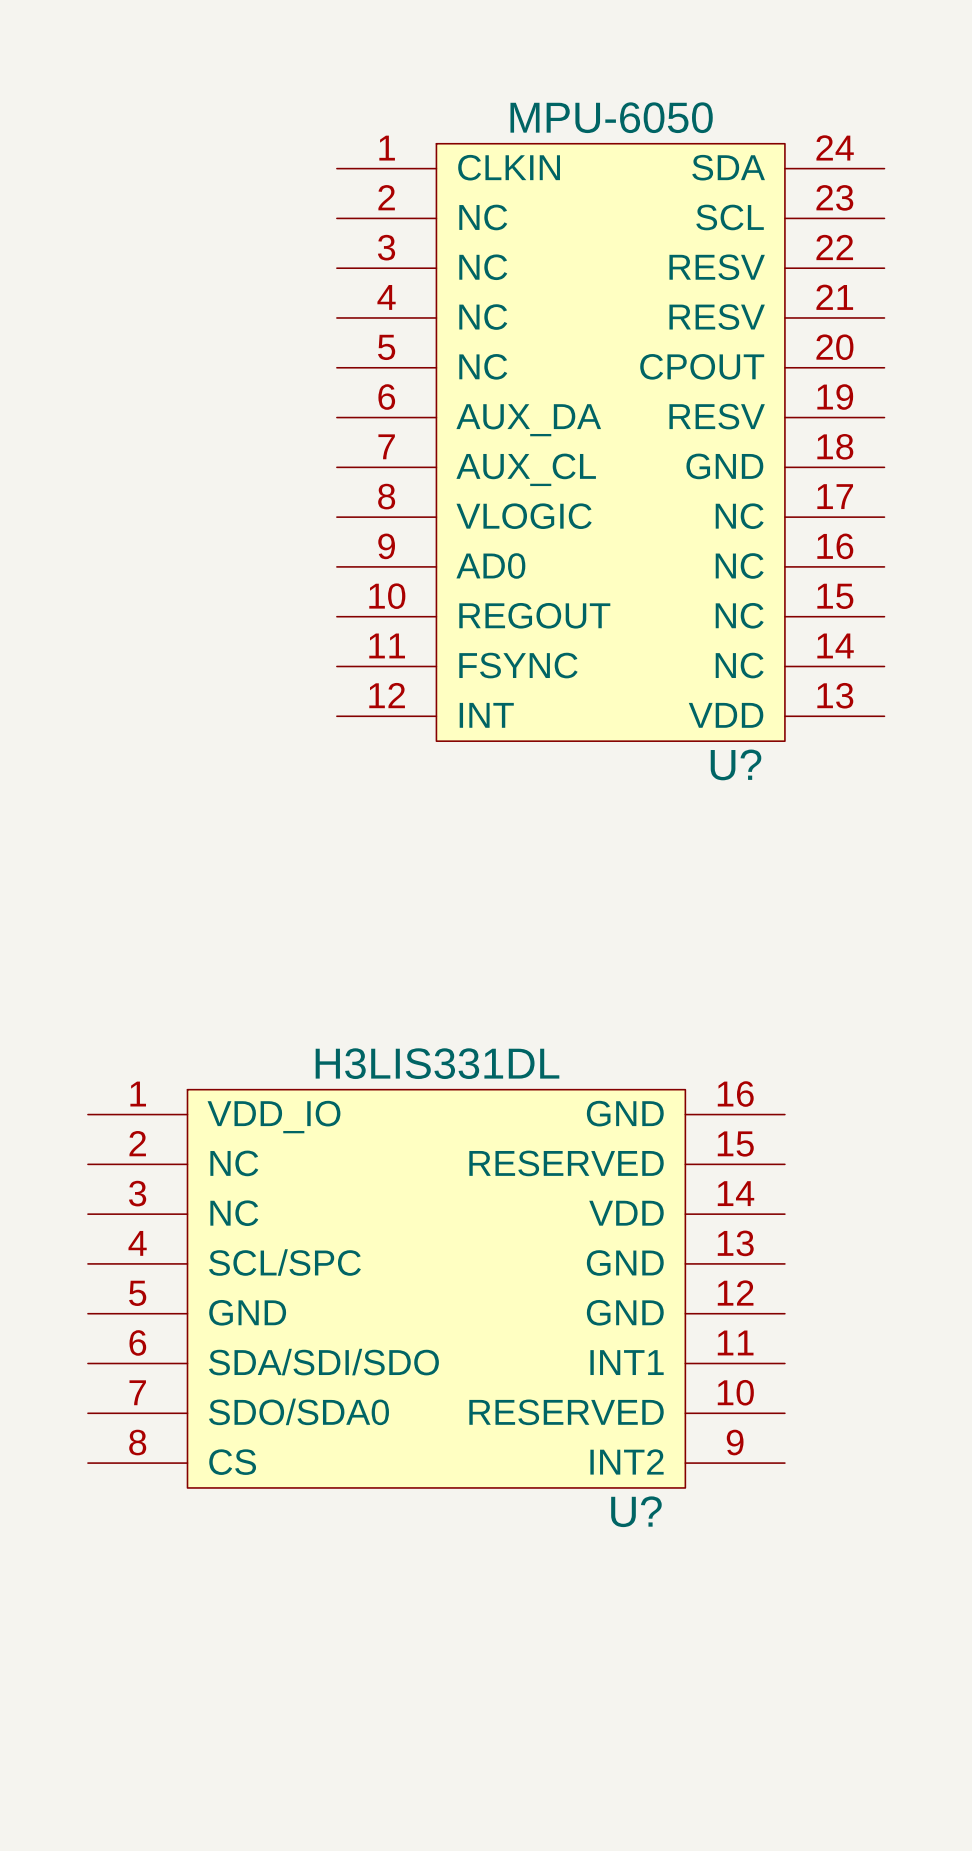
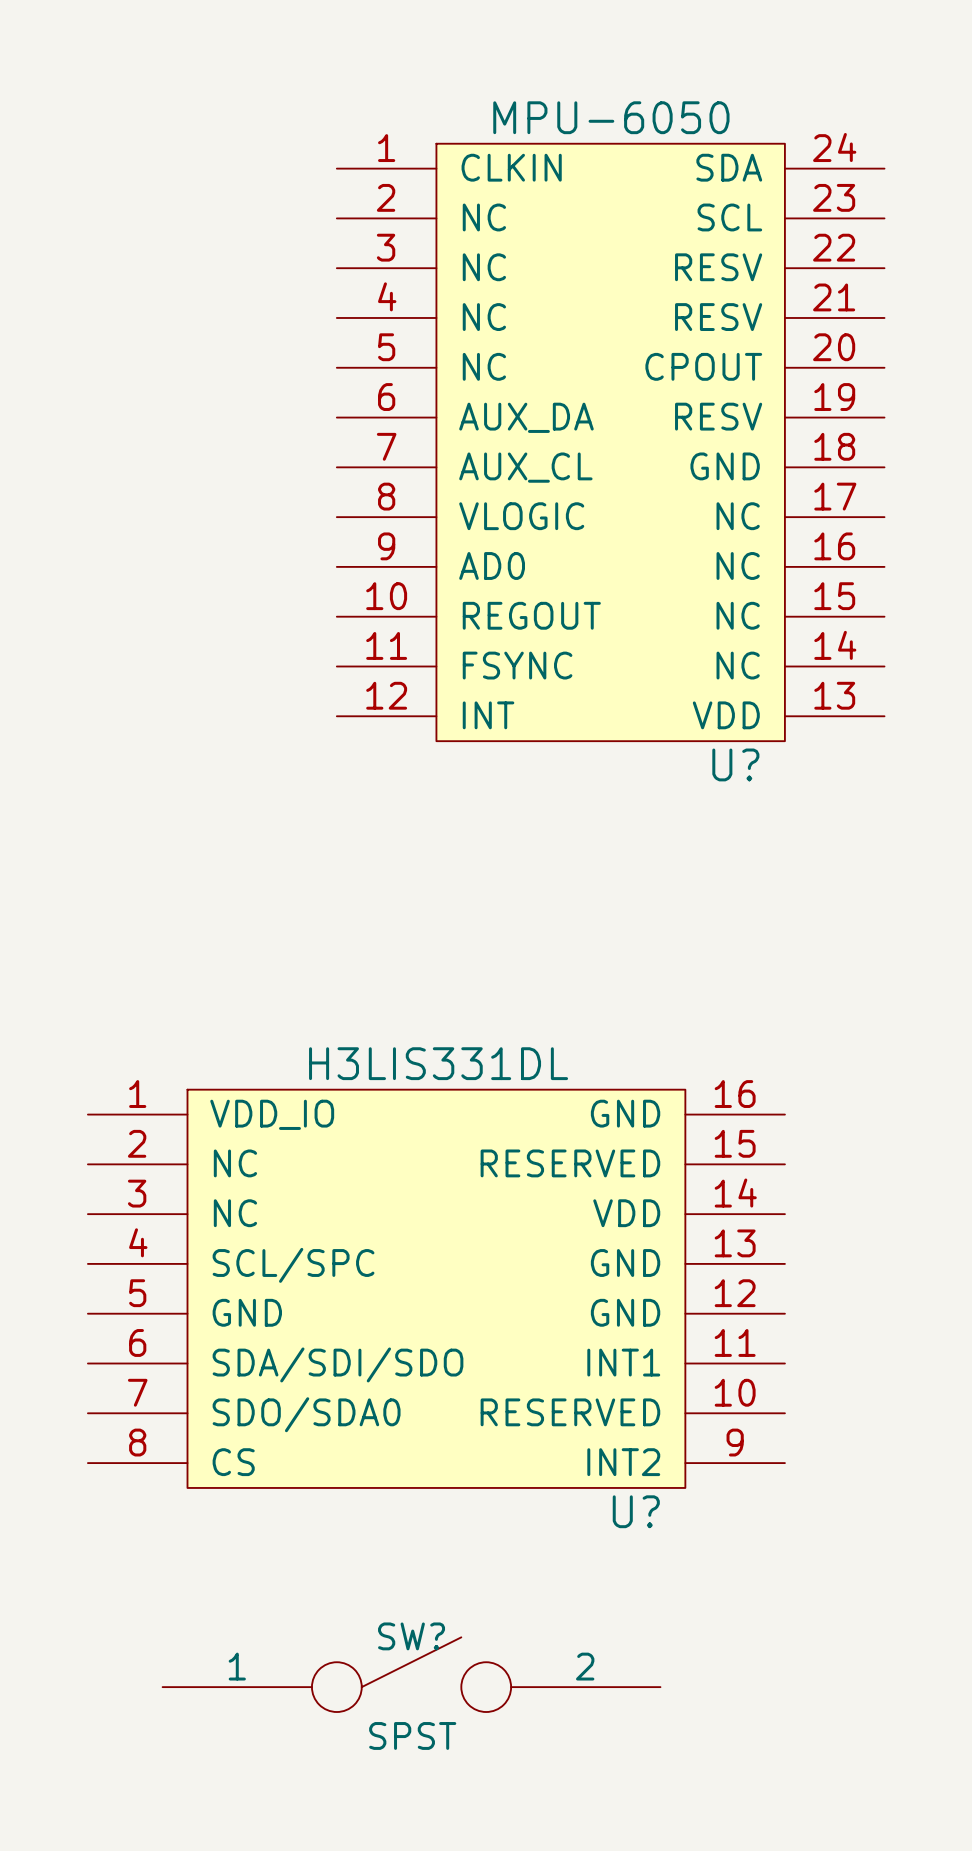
SW?: none -> SPST (411, 1674)

